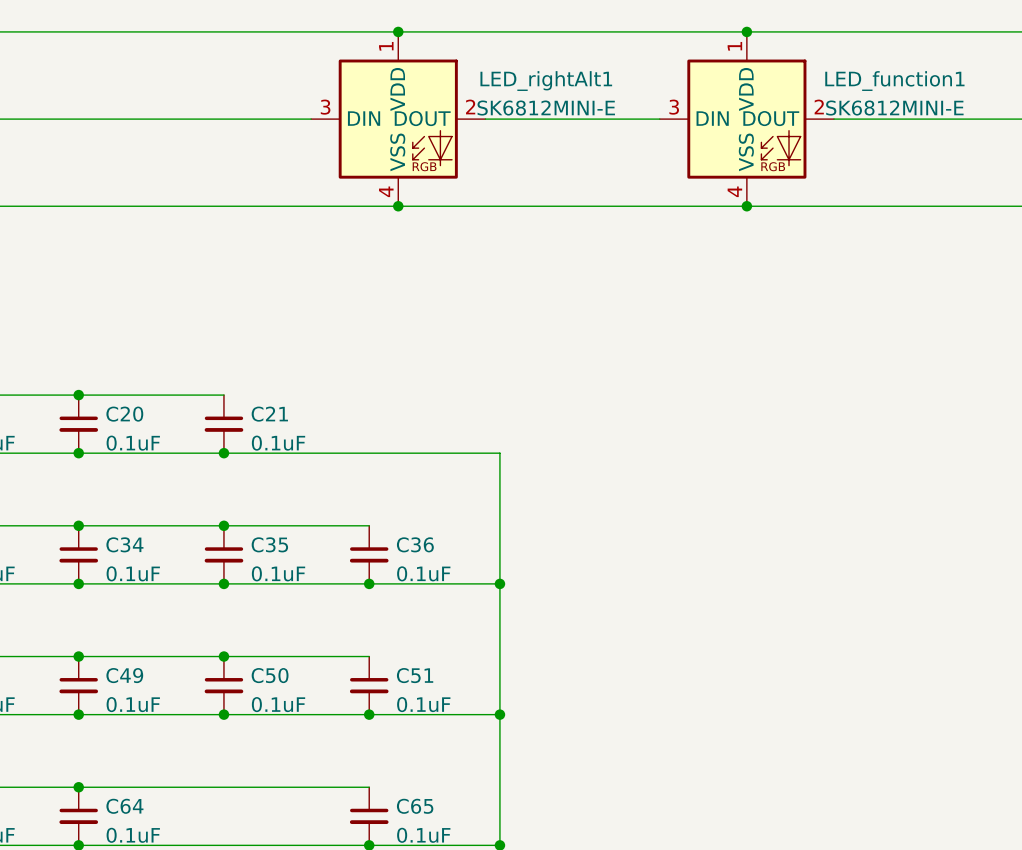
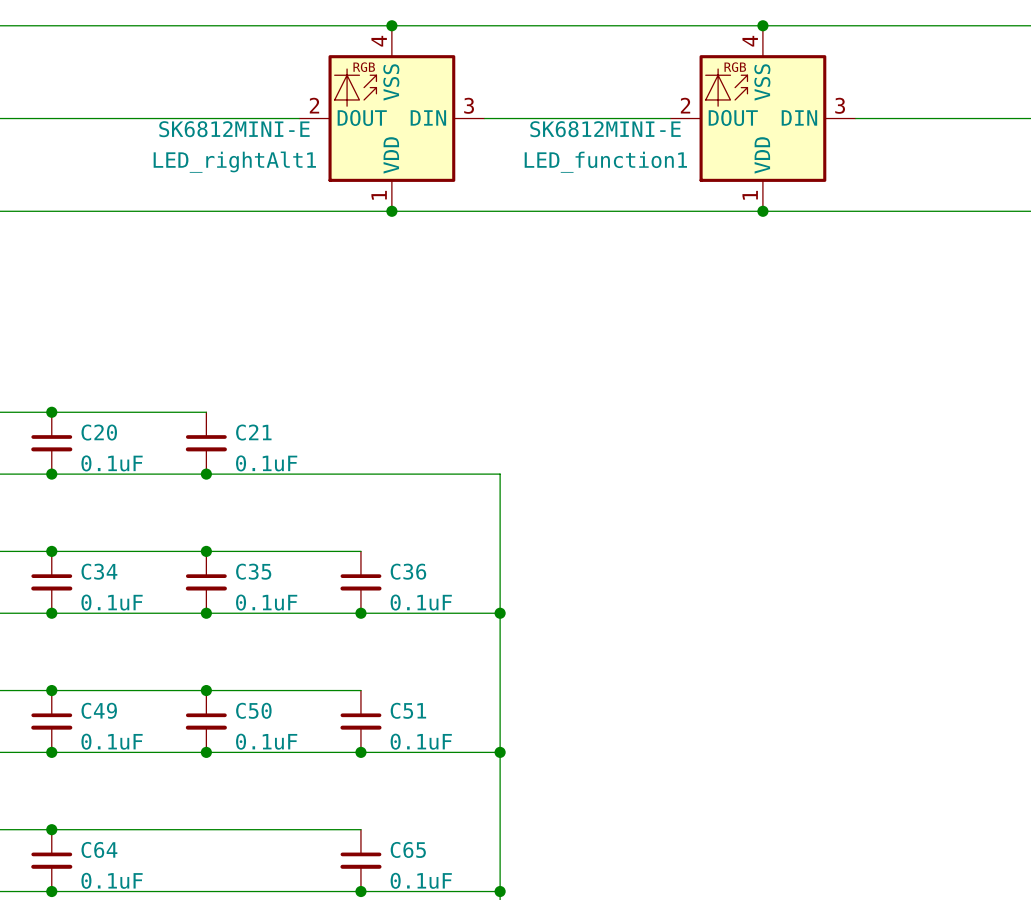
LED_rightAlt1 rotation: 0° (398, 119) -> 180° (391, 118)
LED_function1 rotation: 0° (746, 119) -> 180° (762, 118)

